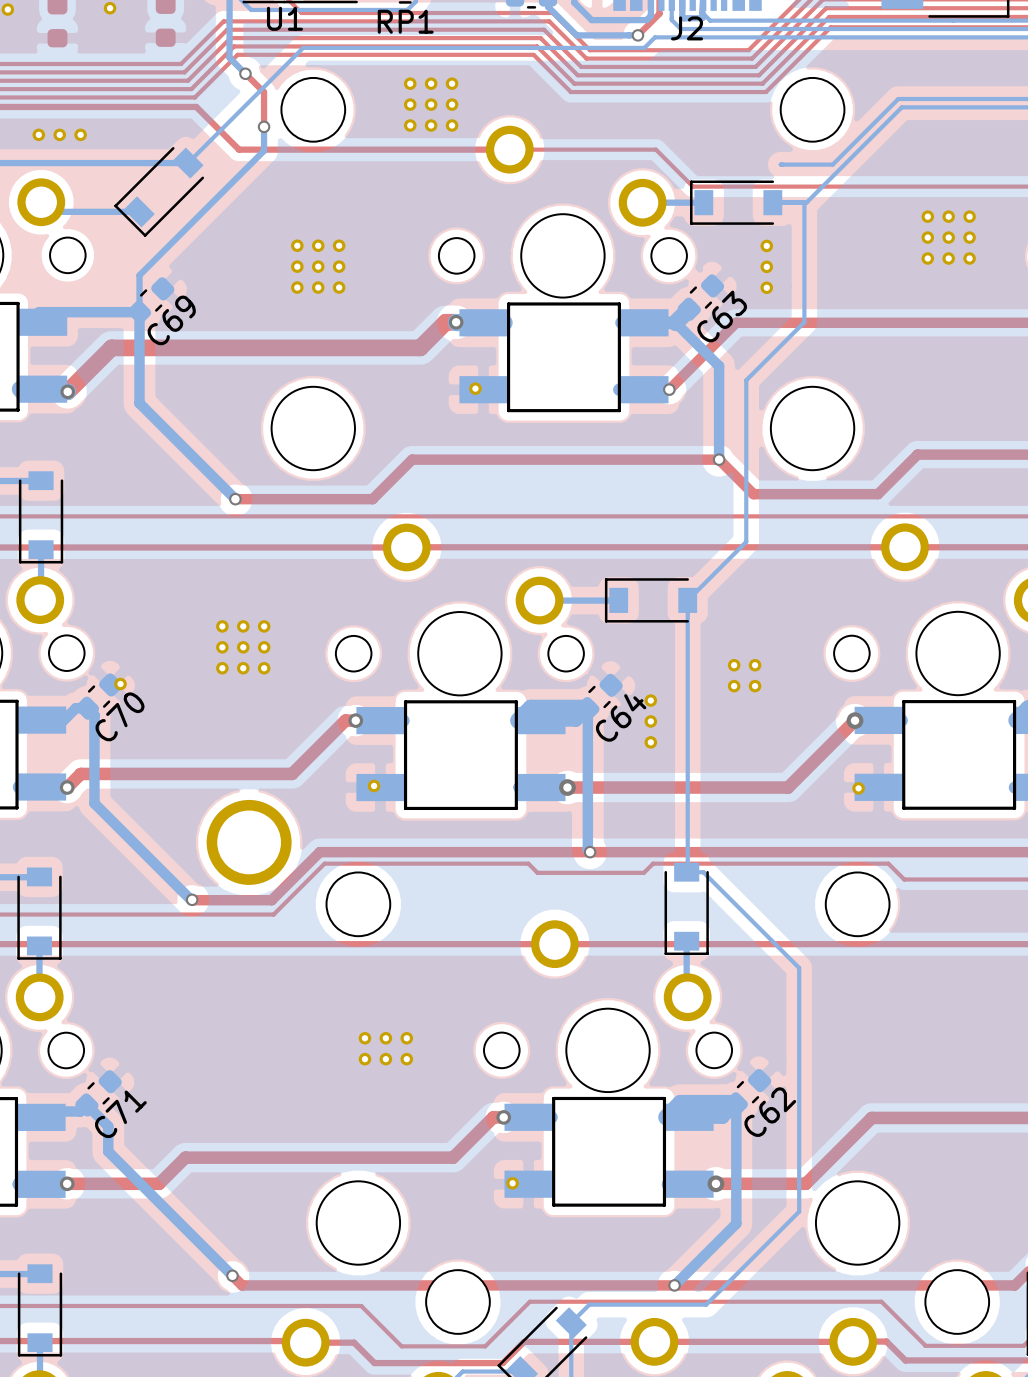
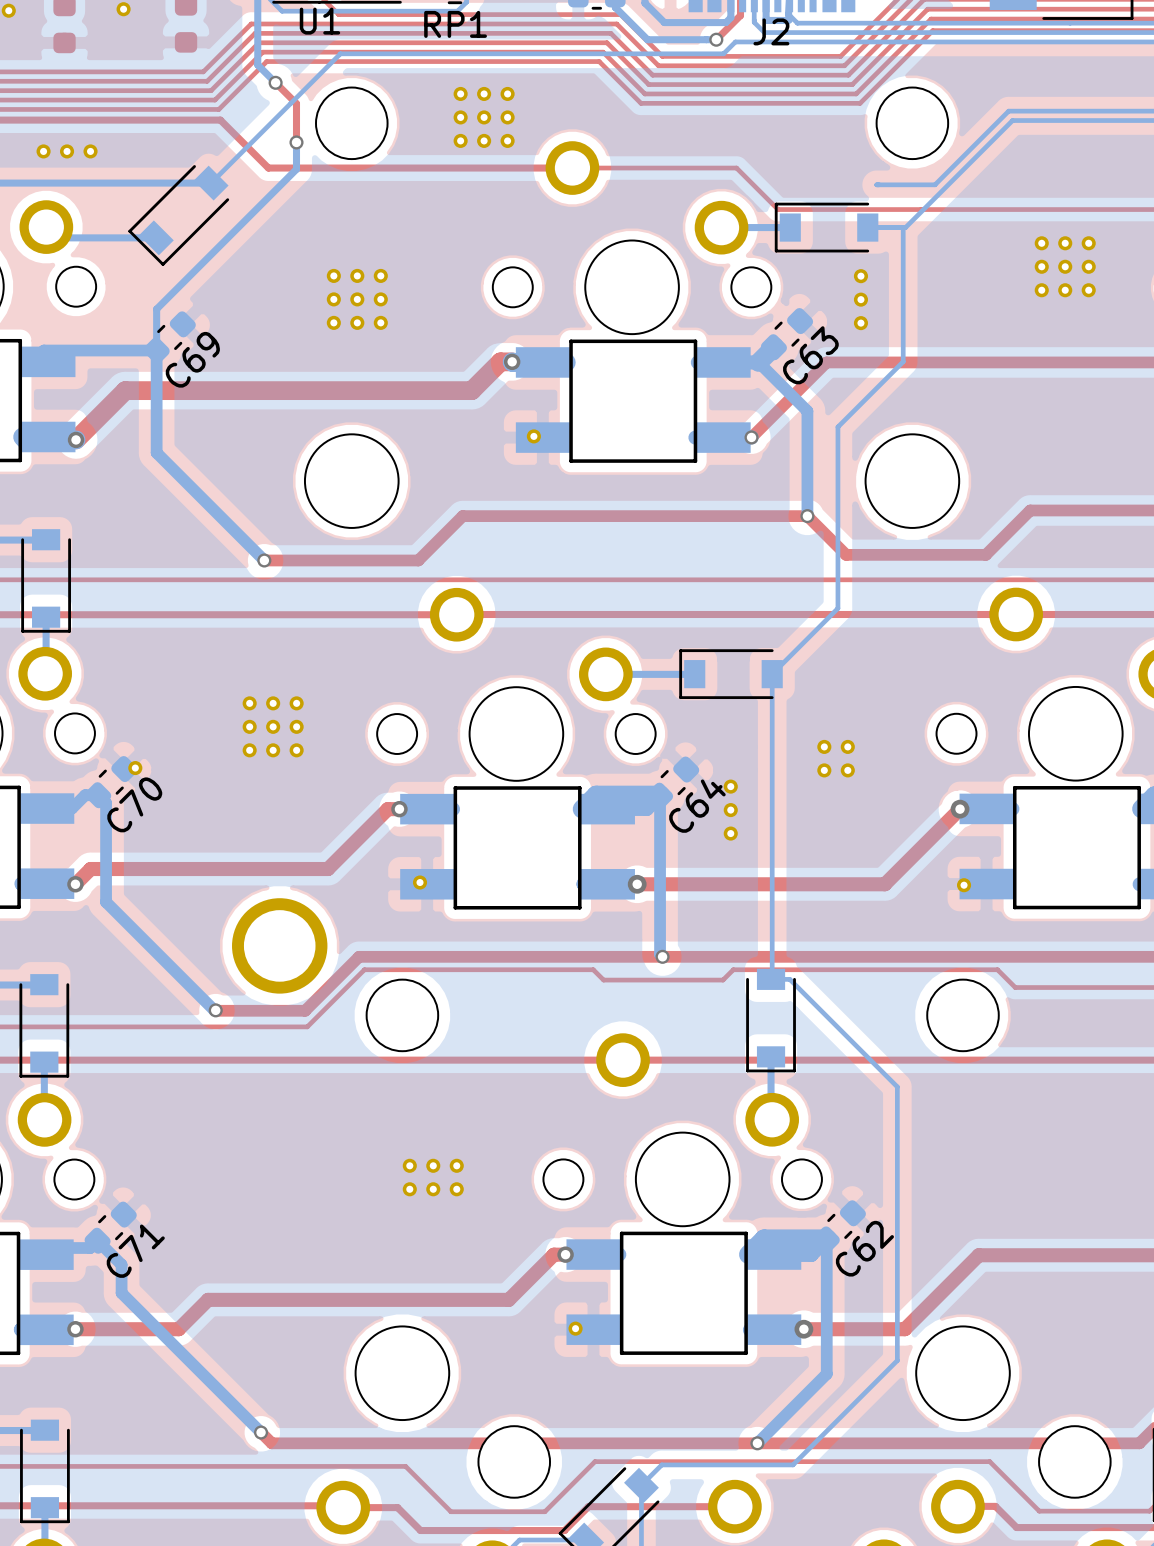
top track: (853, 1341) (654, 1341) -> none

